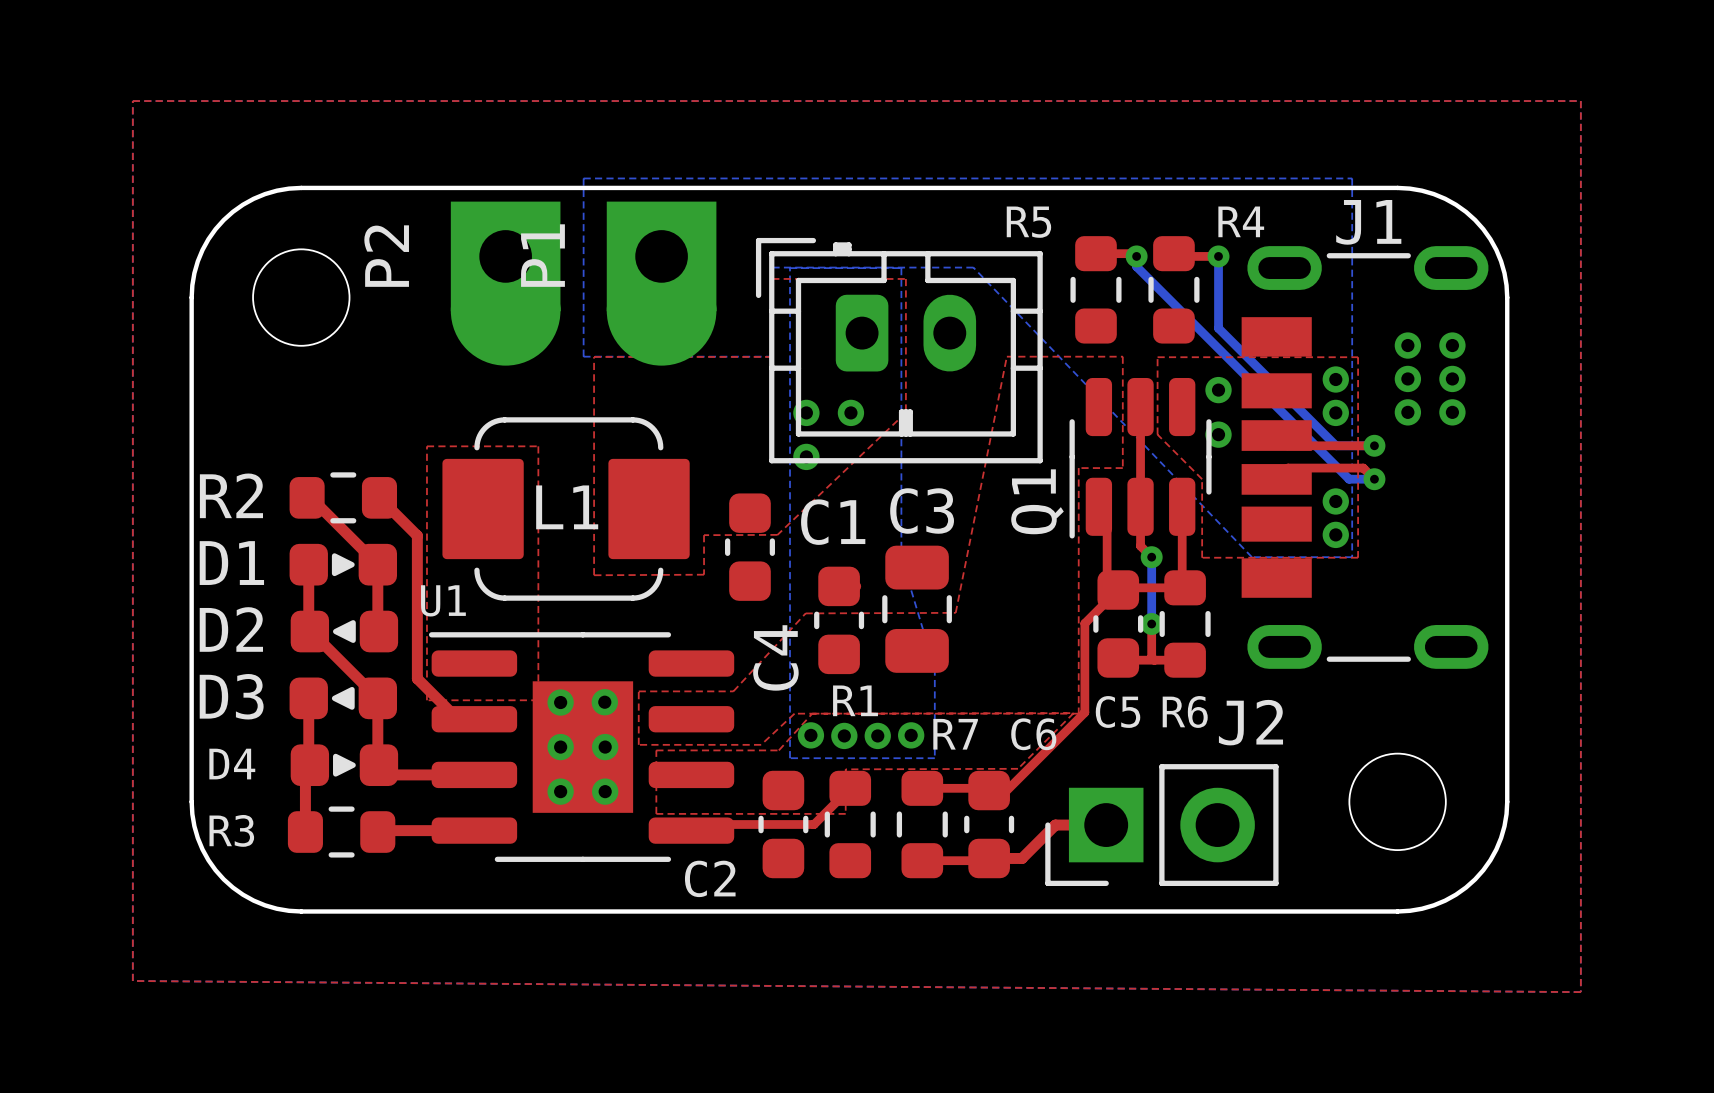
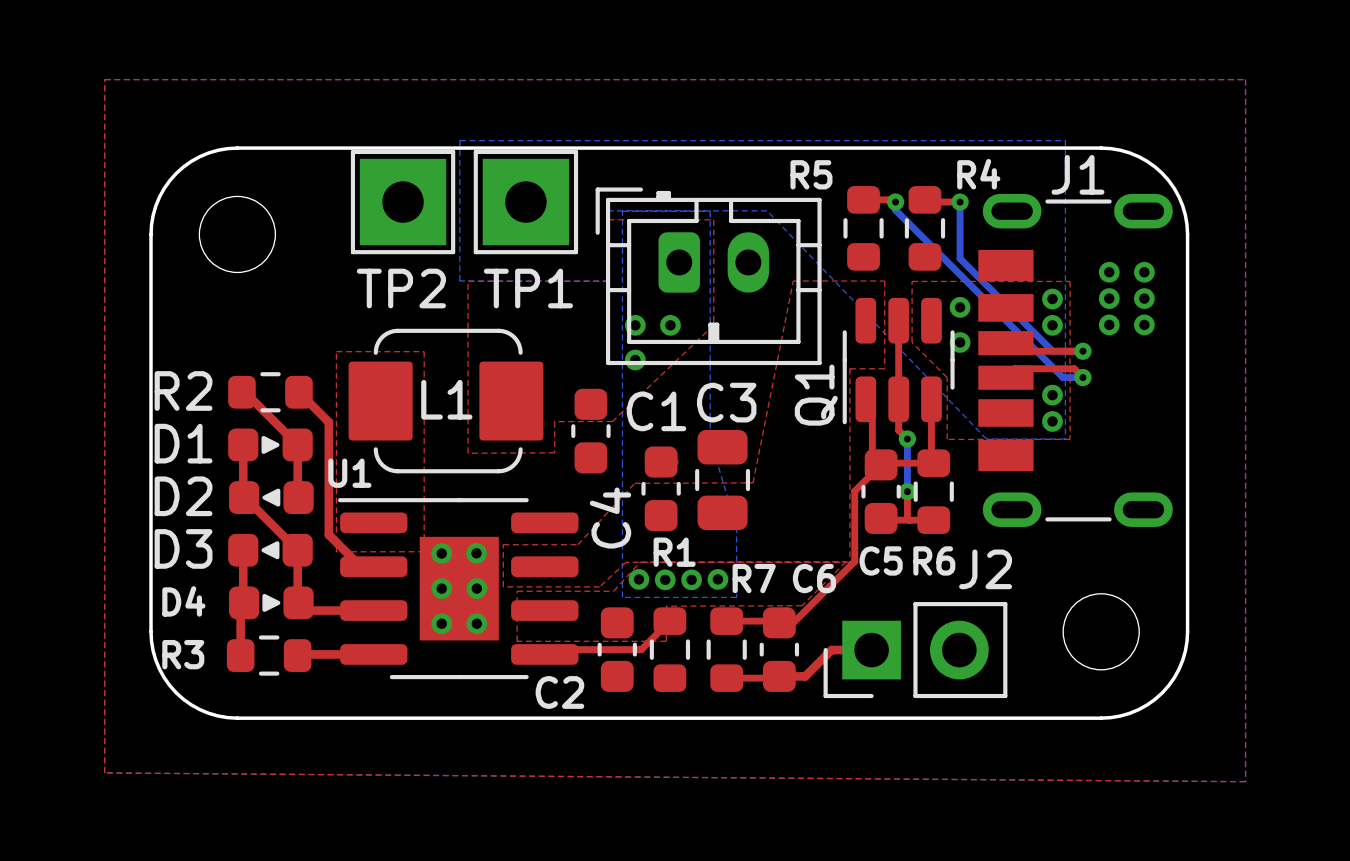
TP2: none -> (403, 202)
TP1: none -> (525, 202)
P2: (505, 283) -> none
P1: (661, 283) -> none

